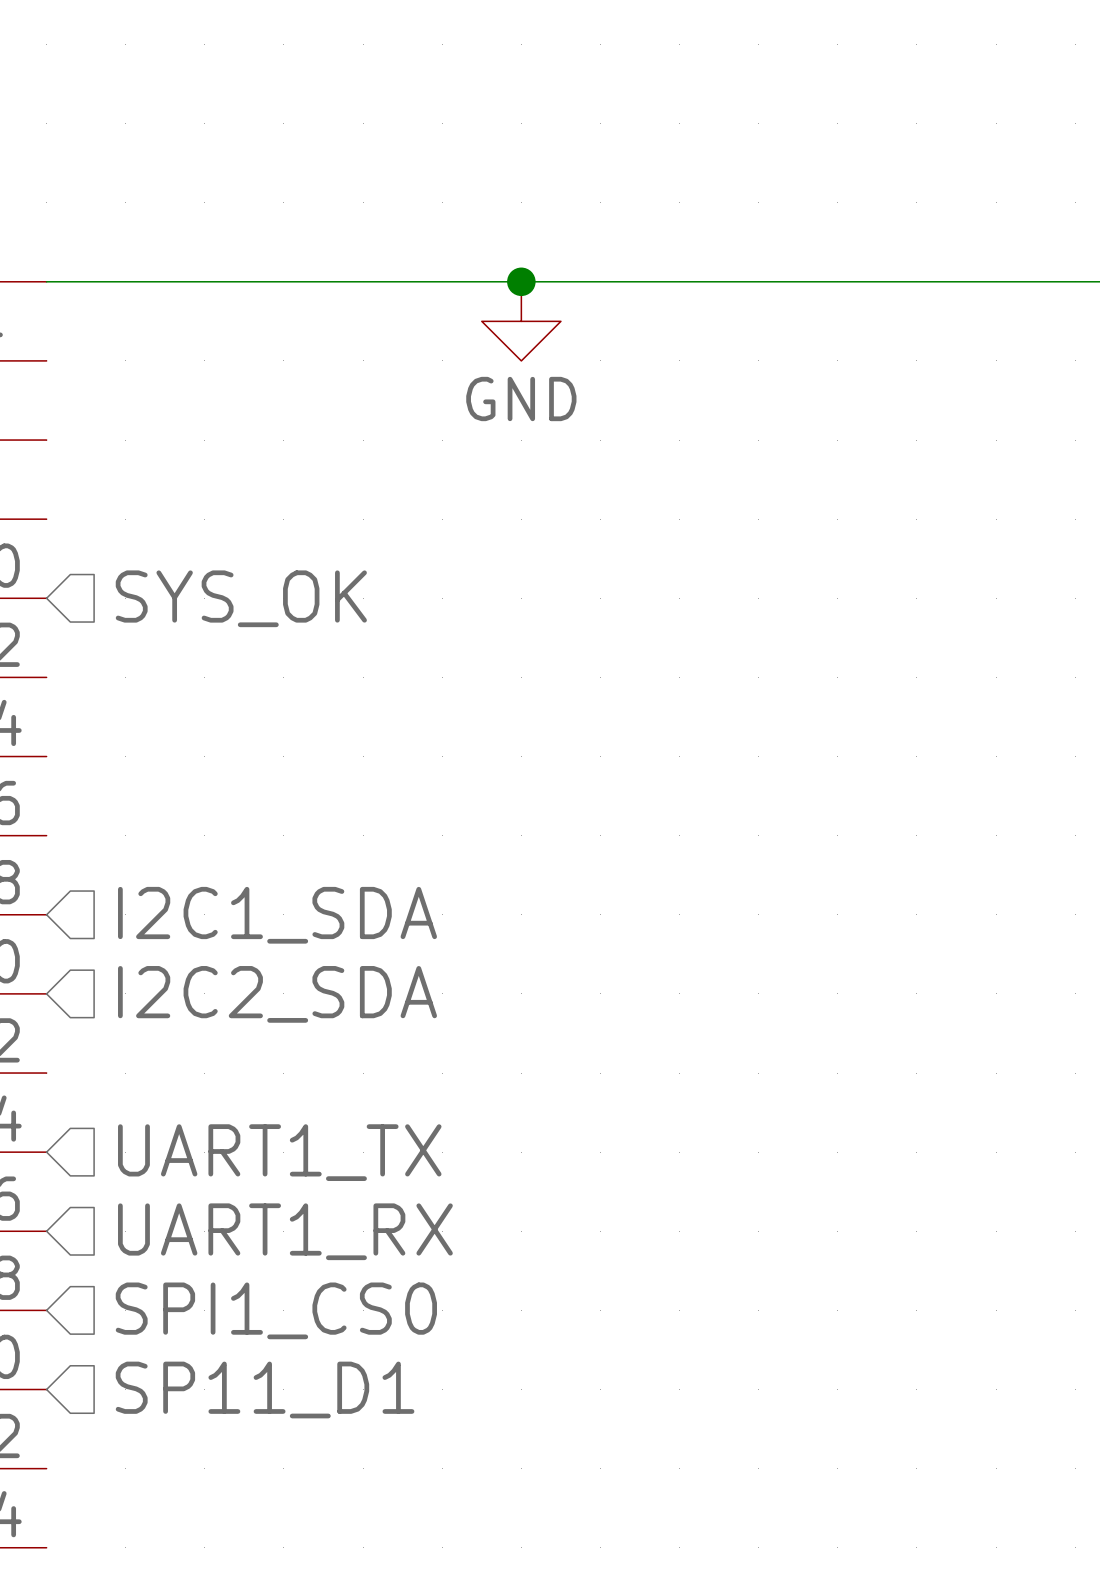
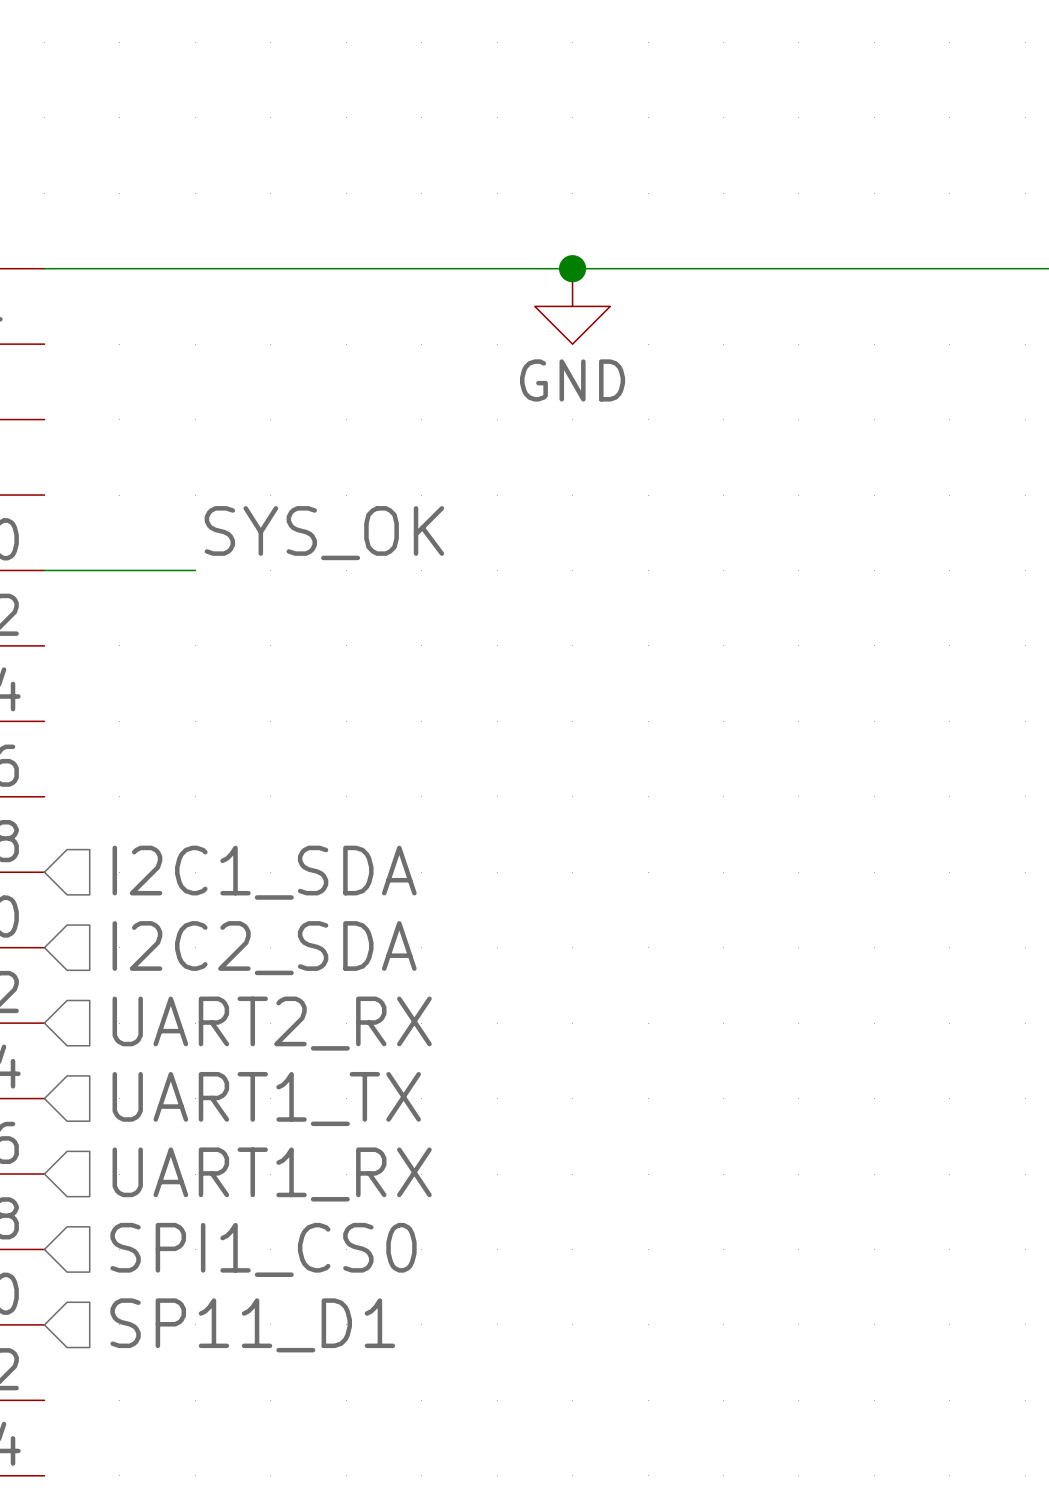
junction position: (521, 281) -> (572, 268)
power symbol position: GND (521, 321) -> GND (572, 306)
label: none -> SYS_OK (324, 533)
wire: none -> (44, 570) (195, 570)
hierarchical label: SYS_OK (241, 598) -> none
hierarchical label: none -> UART2_RX (272, 1023)

